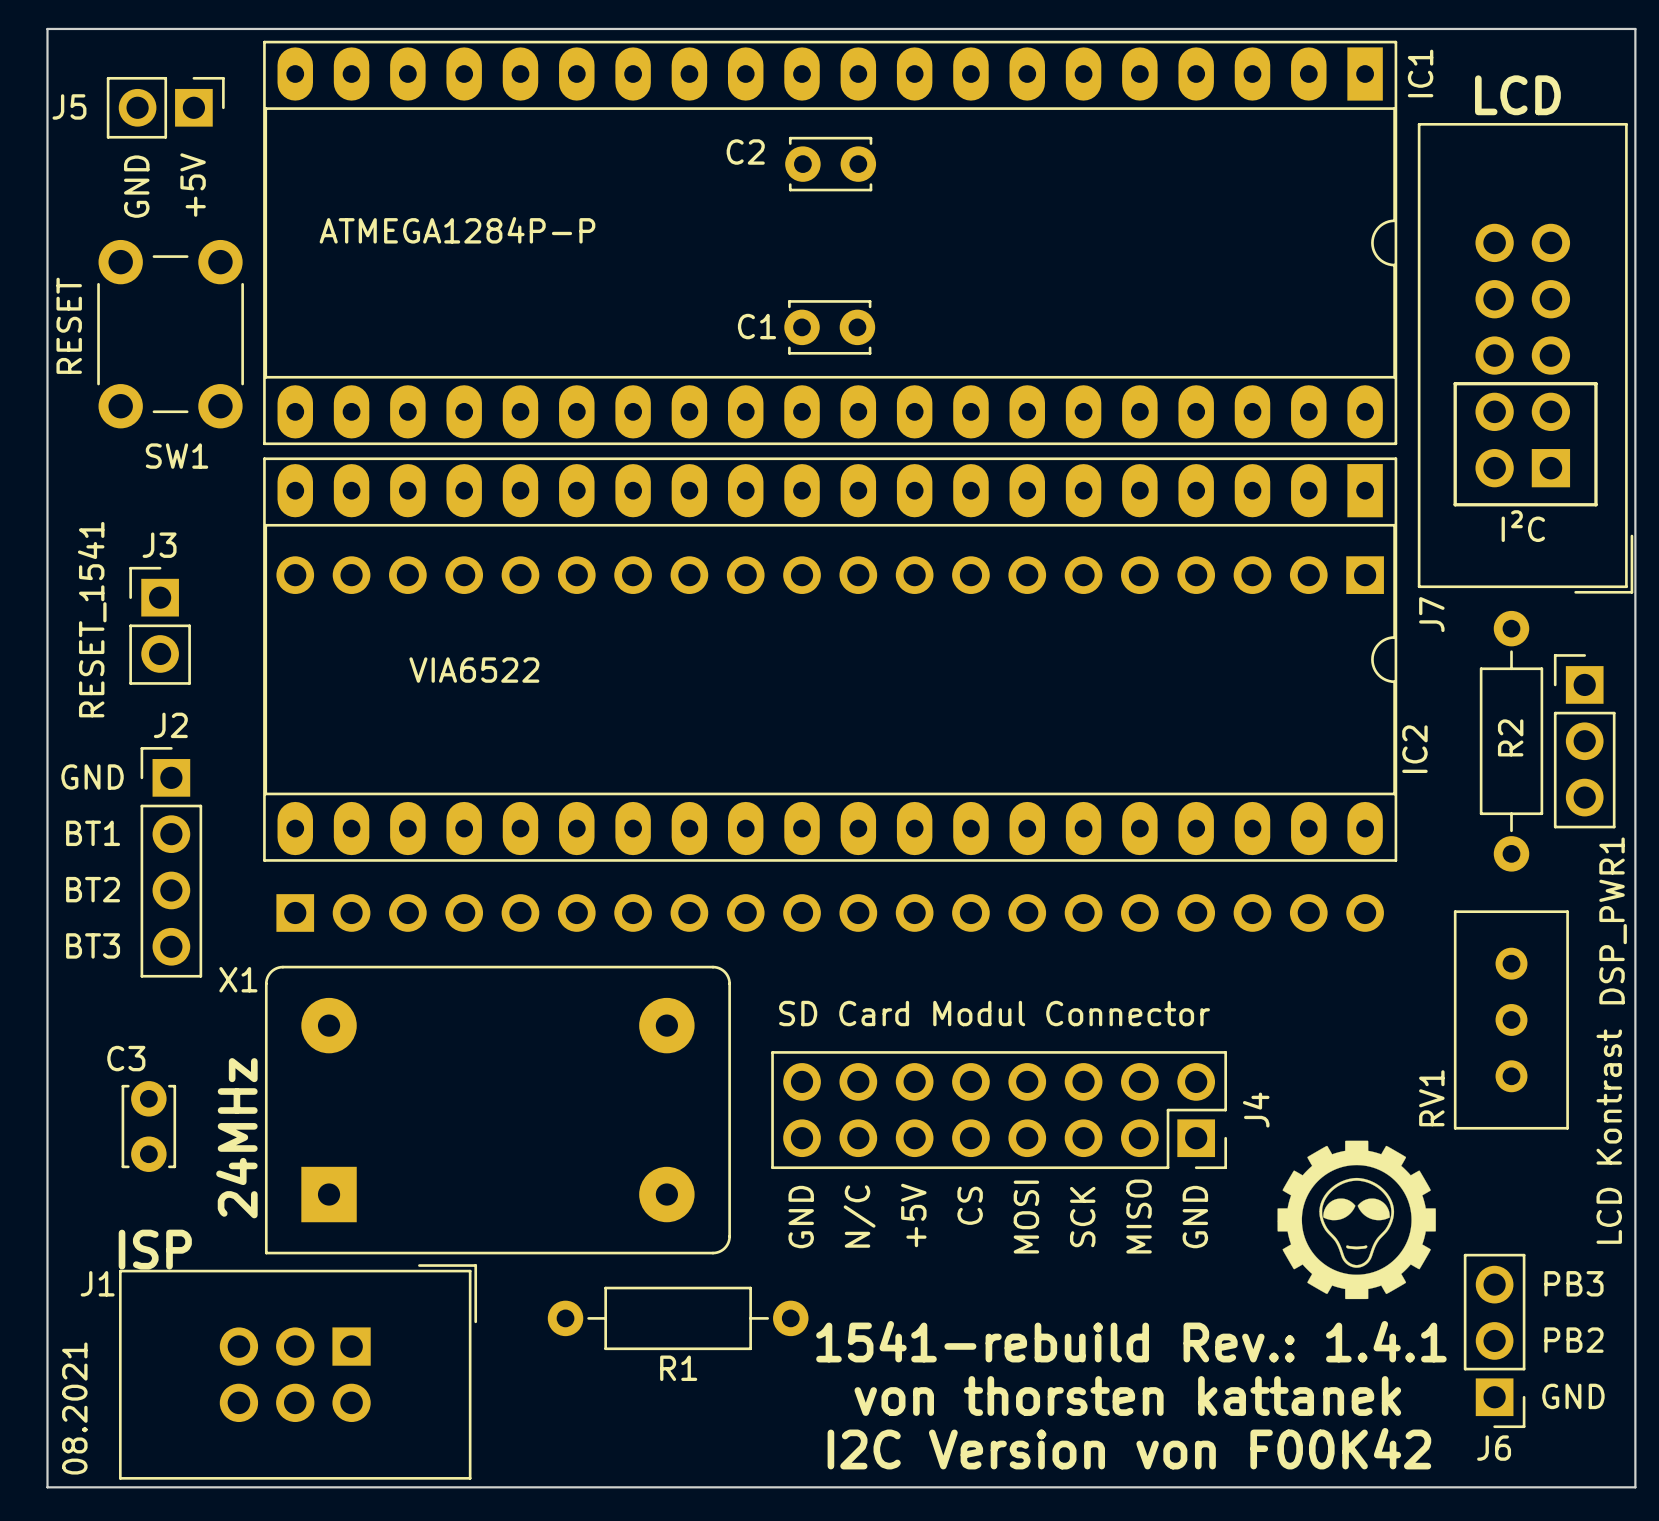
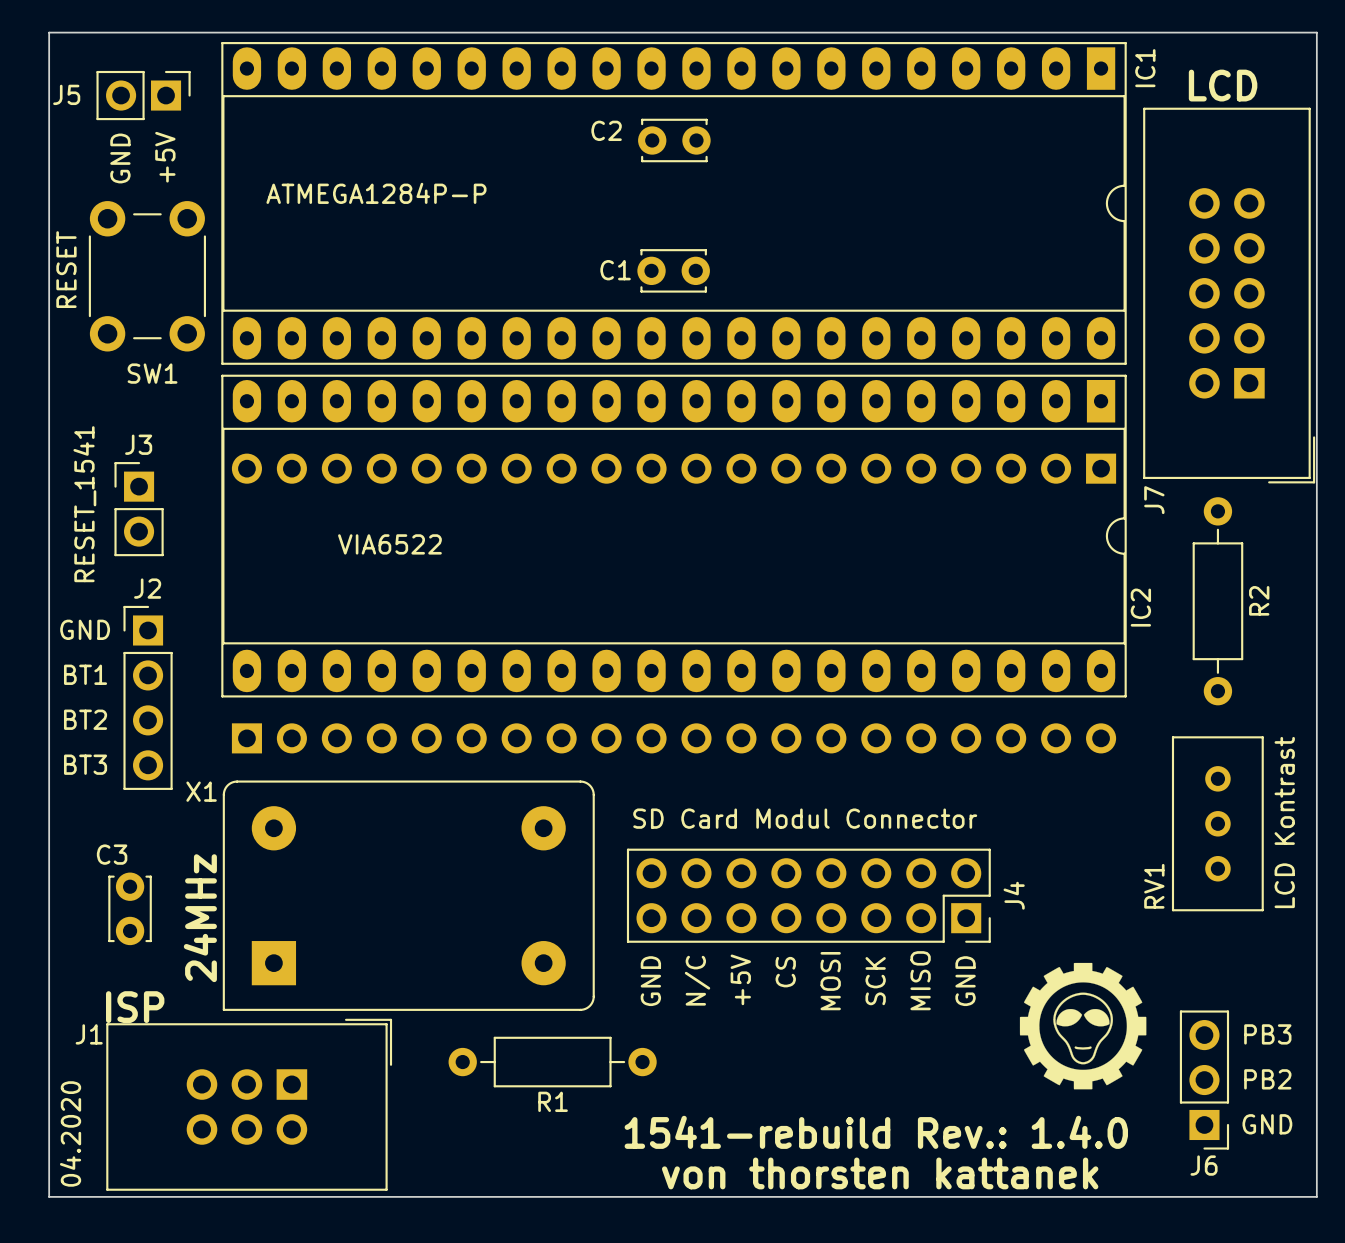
line: (1455, 383) (1595, 383) (1595, 504) (1455, 504) (1455, 383) -> none
text: I²C (1523, 526) -> none
R2 name position: R2 (1510, 737) -> R2 (1259, 600)
DSP_PWR1: (1584, 741) -> none
text position: LCD Kontrast (1609, 1136) -> LCD Kontrast (1284, 822)
drawing position: (1356, 1219) -> (1083, 1026)
text: 1541-rebuild Rev.: 1.4.1 (1131, 1341) -> 1541-rebuild Rev.: 1.4.0 (876, 1132)
text position: von thorsten kattanek (1127, 1395) -> von thorsten kattanek (880, 1173)
text: 08.2021 (74, 1408) -> 04.2020 (70, 1133)
text: I2C Version von F00K42 (1129, 1448) -> none

